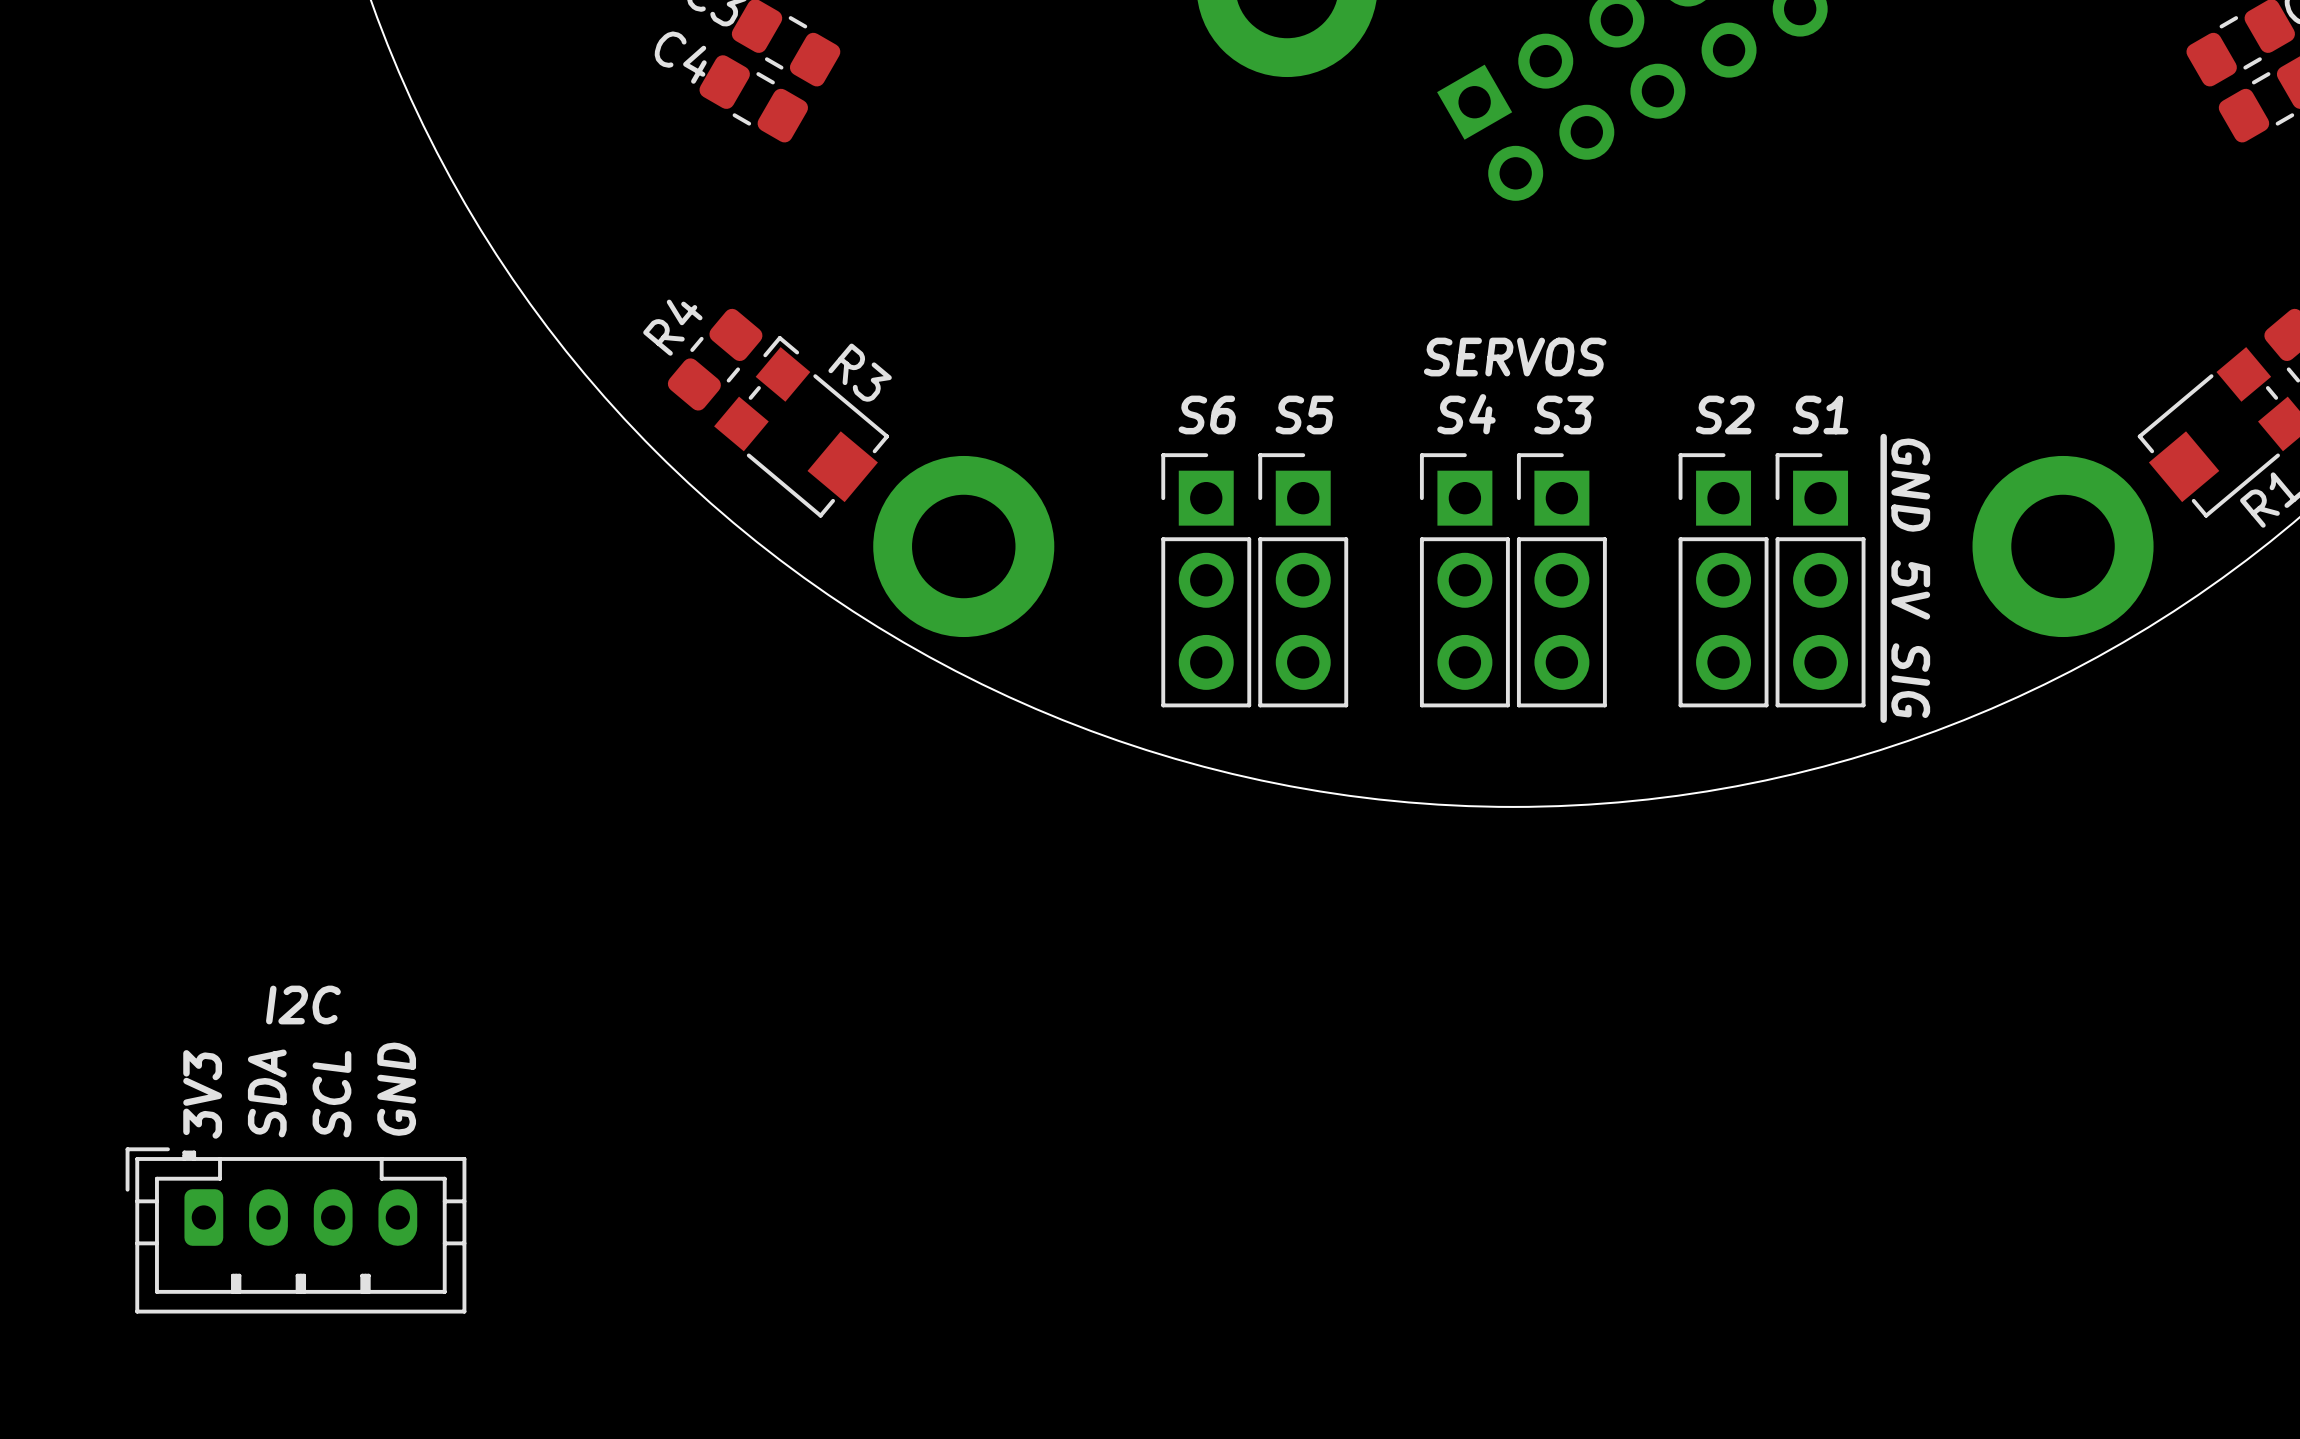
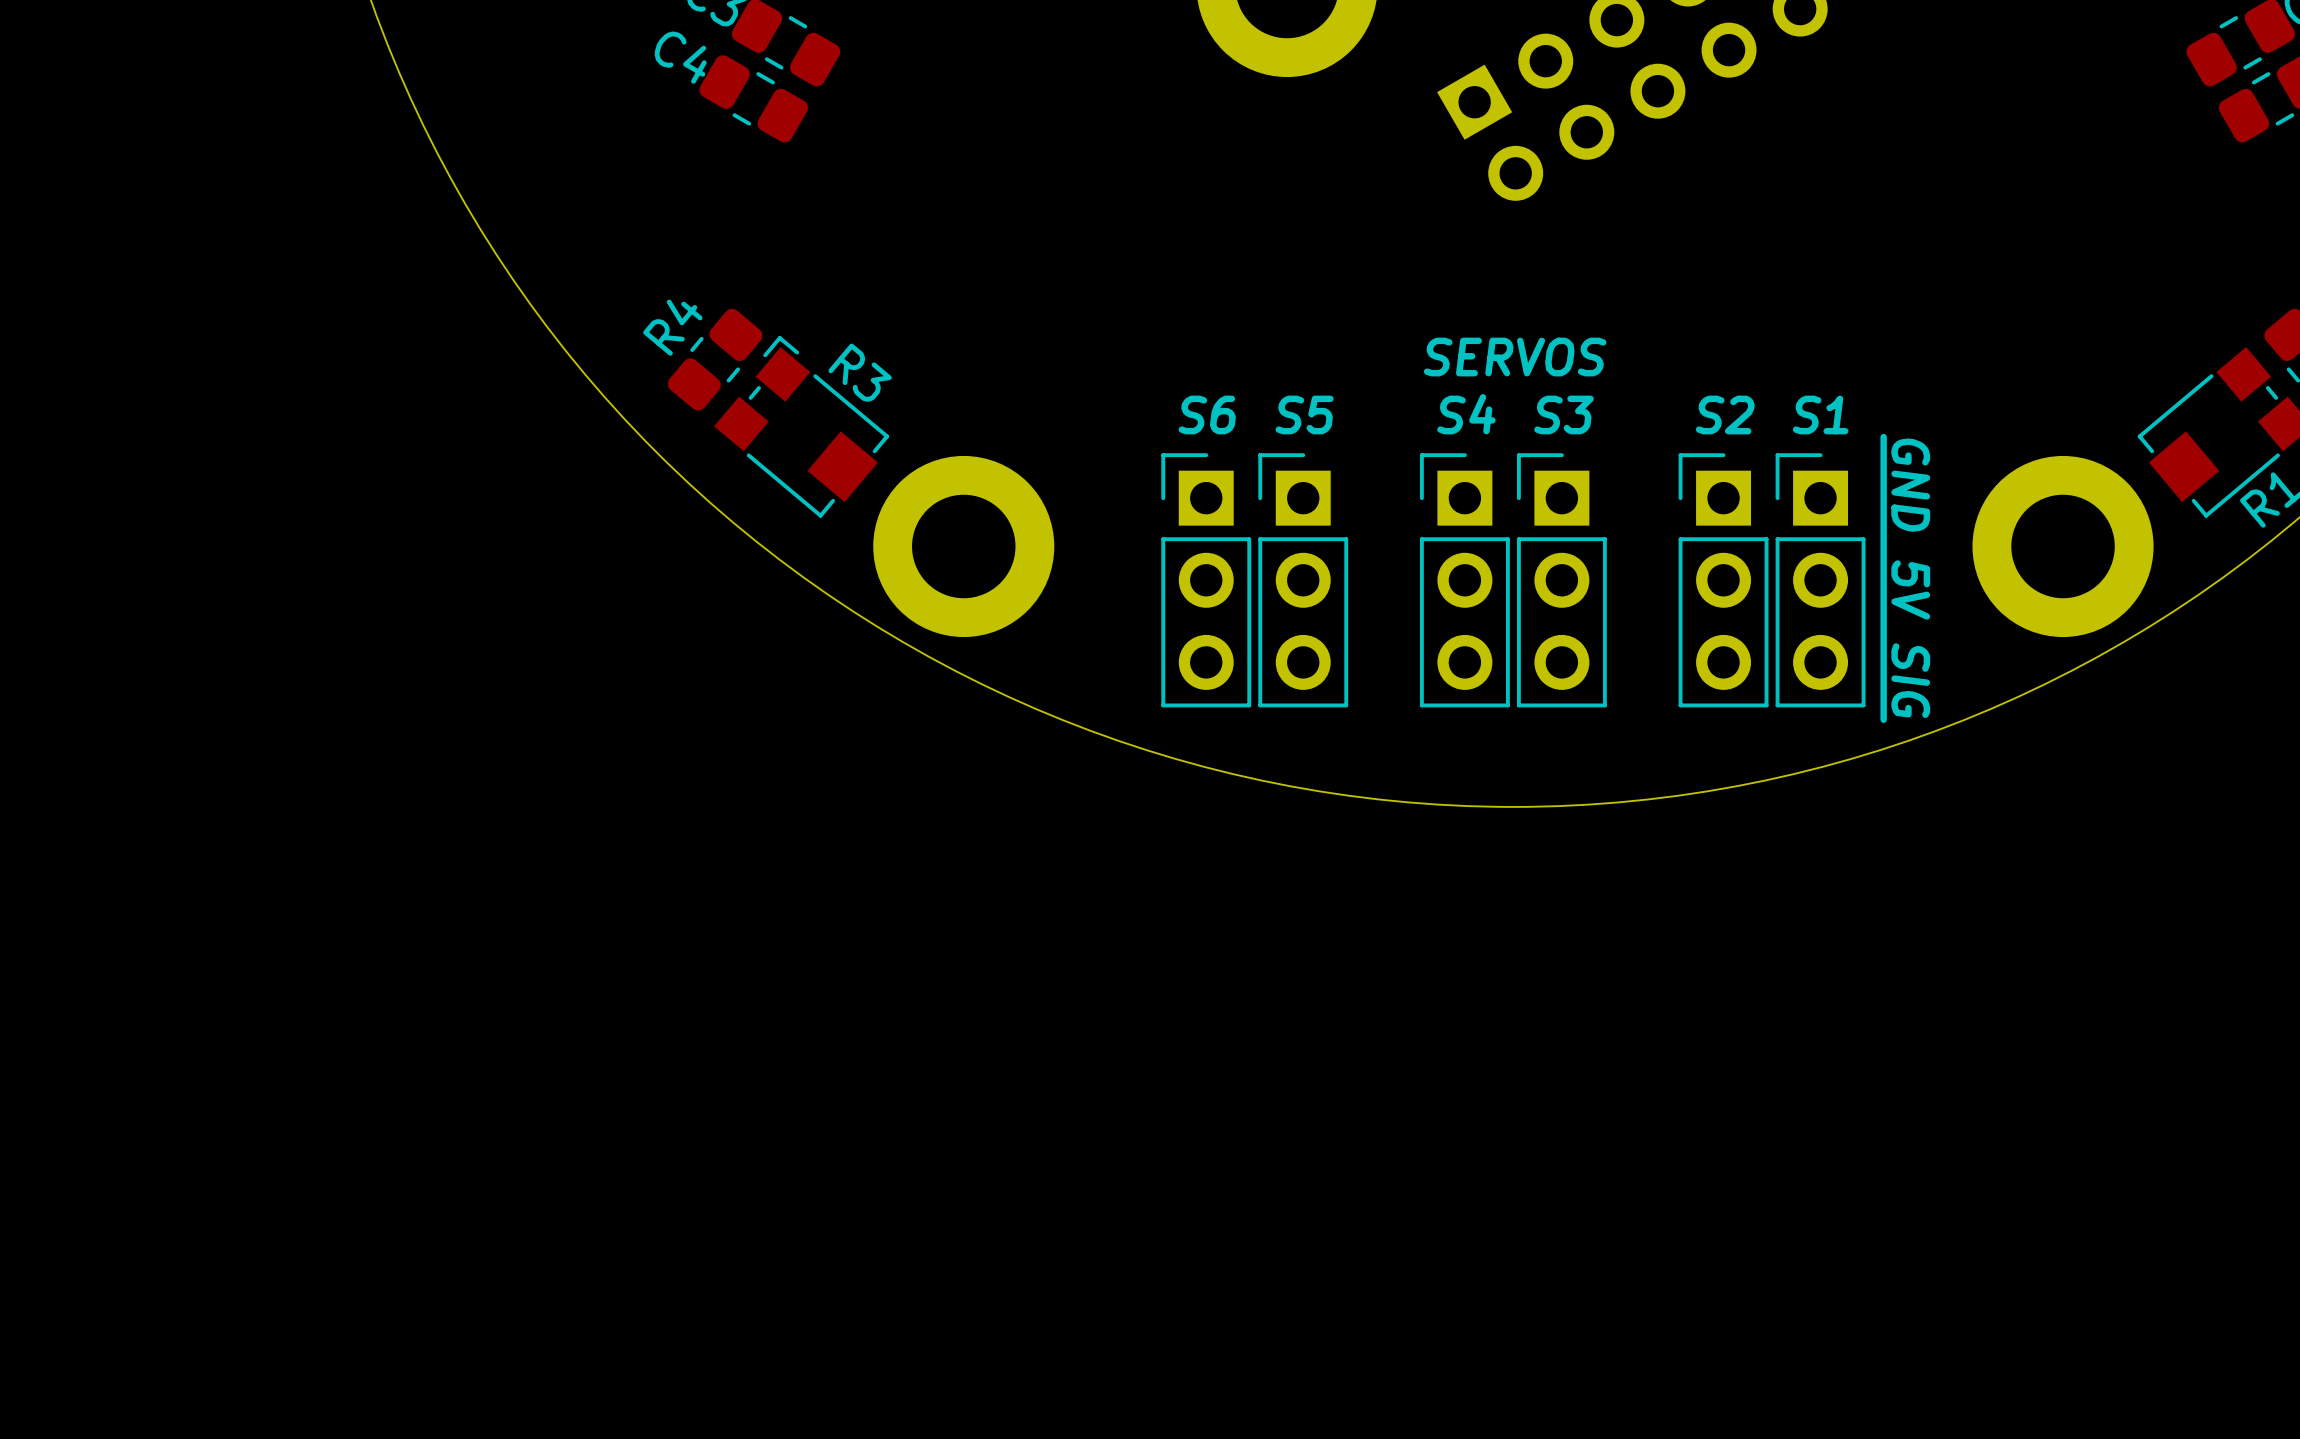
text: I2C (303, 1005) -> none
text: GND (396, 1089) -> none
text: SDA (267, 1093) -> none
text: 3V3 (202, 1094) -> none
text: SCL (331, 1094) -> none
part: (295, 1230) -> none

